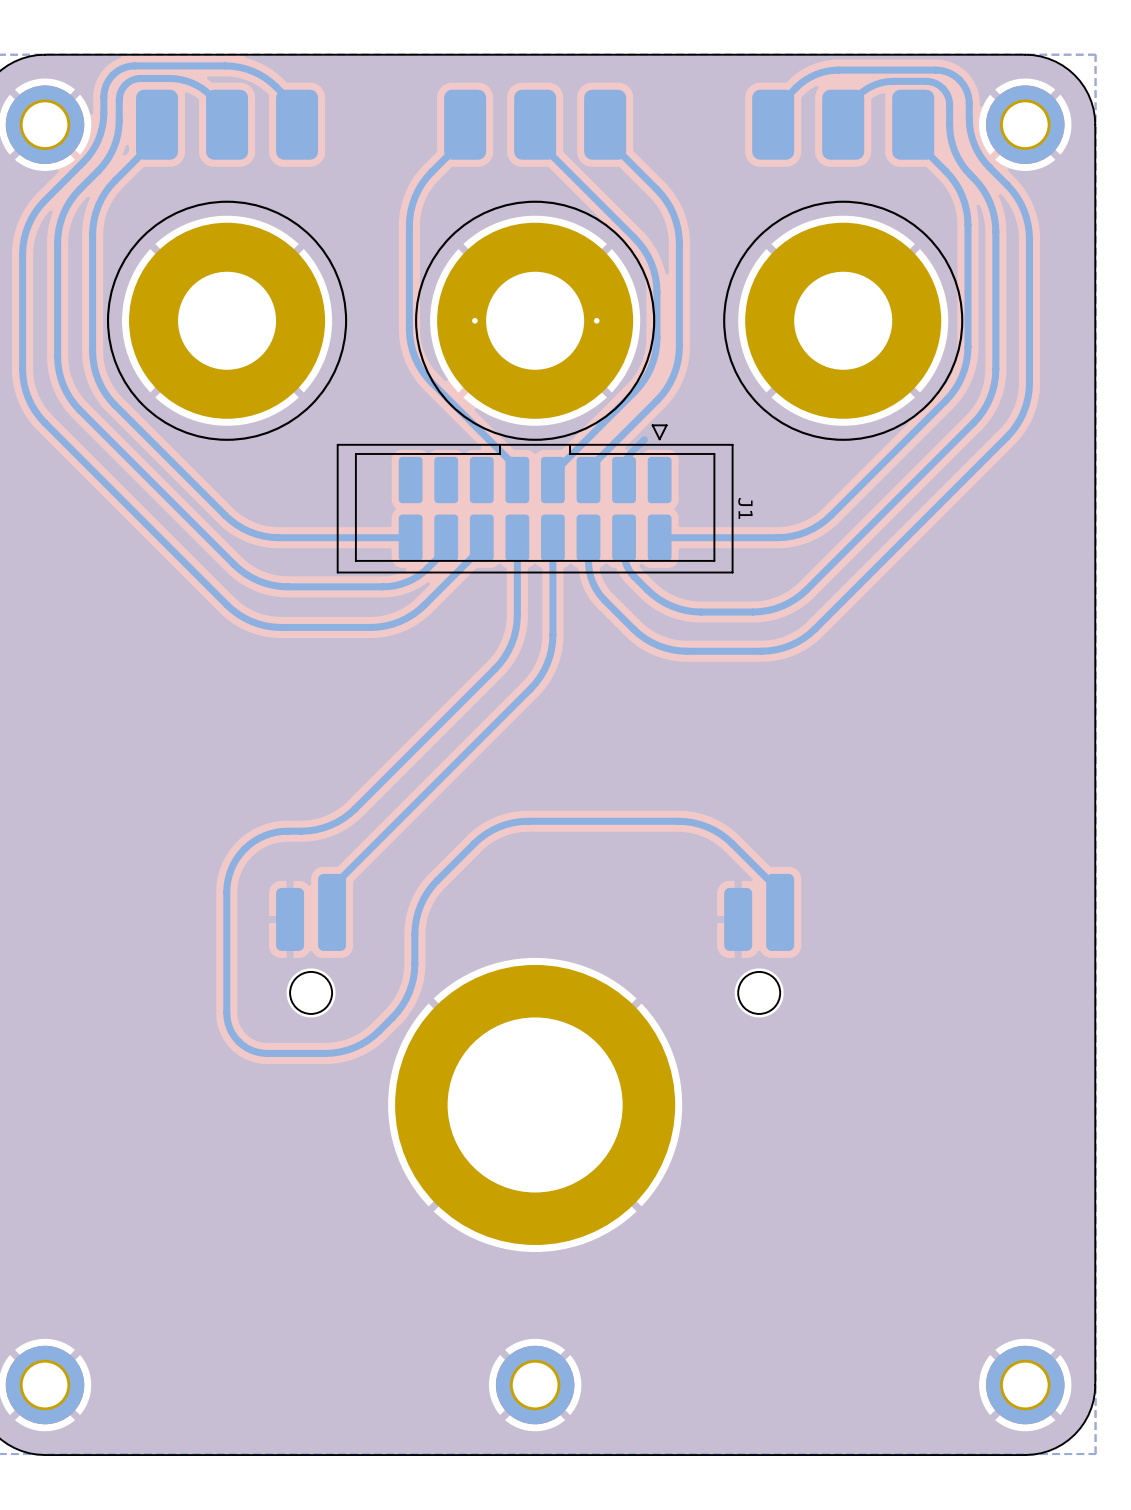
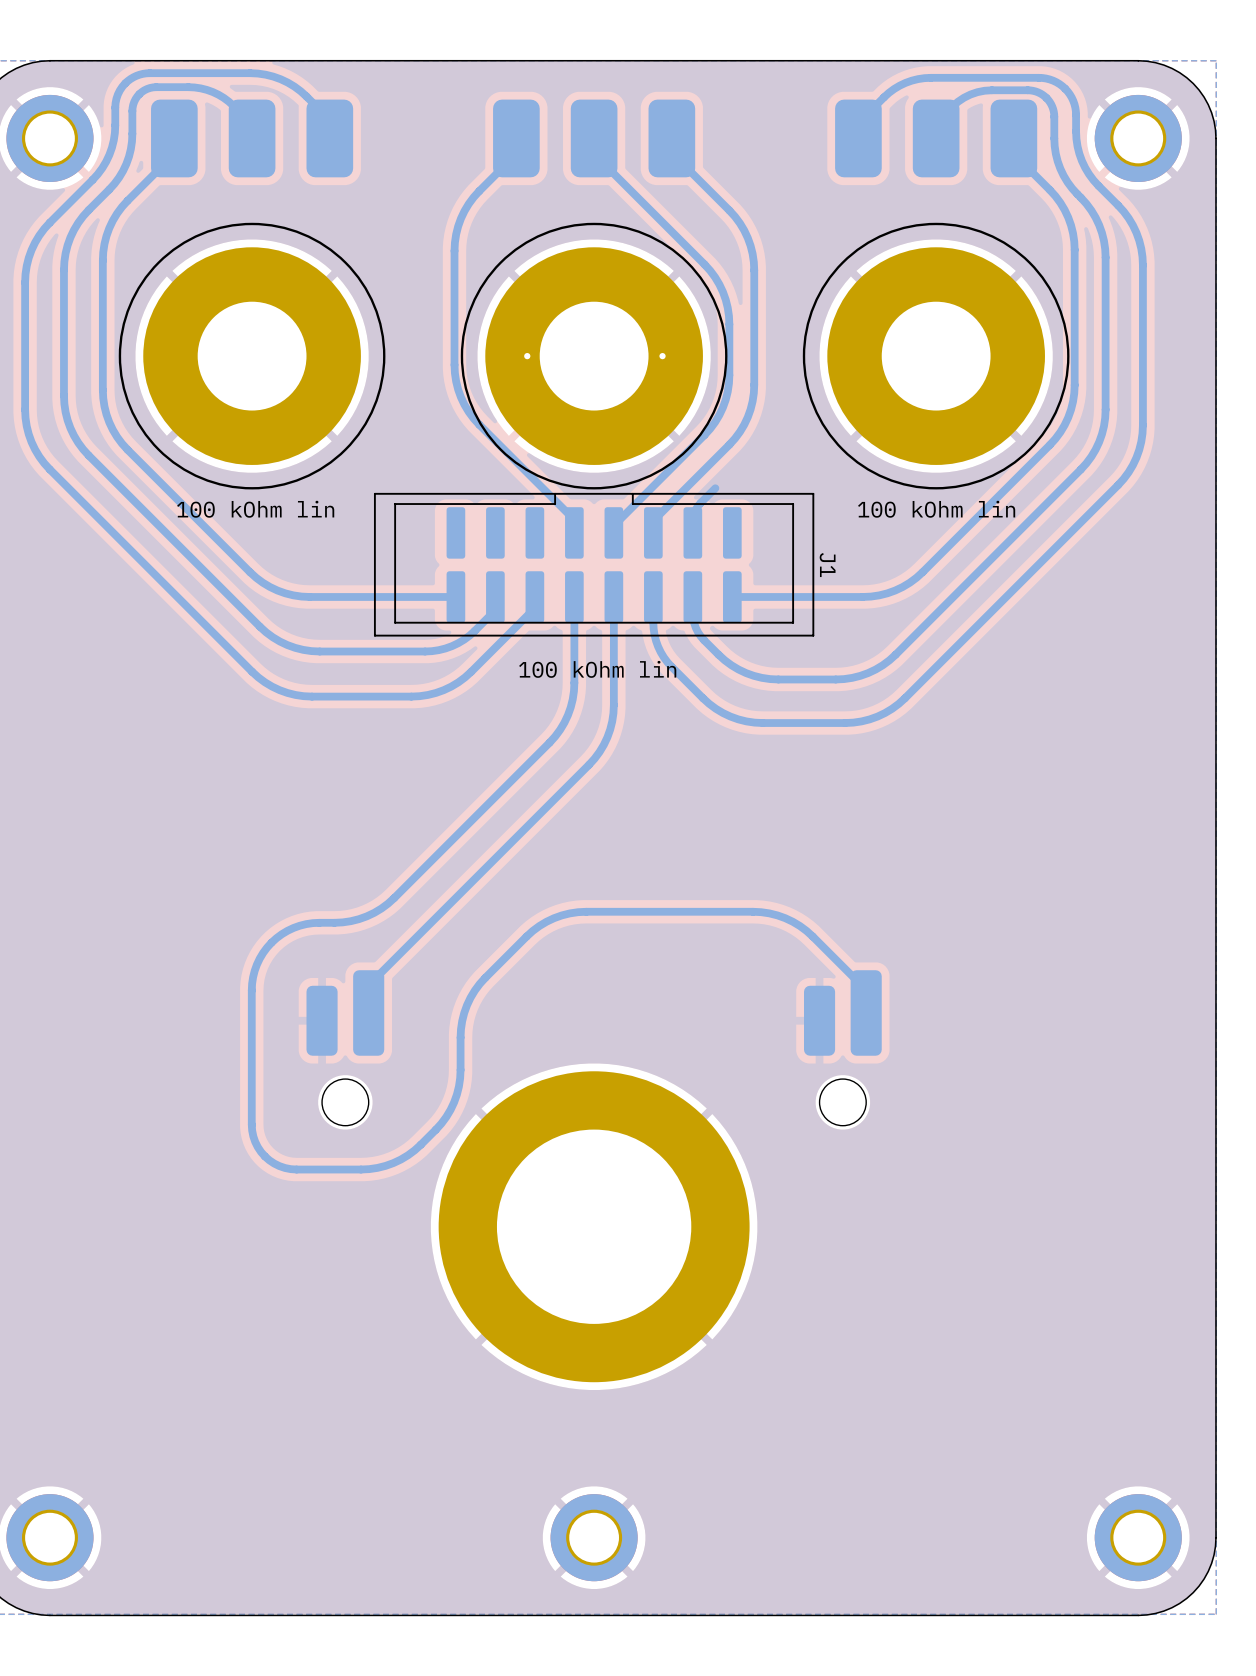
J1 footprint: [336, 424, 734, 574] -> [373, 492, 815, 637]
text: none -> 100 kOhm lin (255, 509)
text: none -> 100 kOhm lin (936, 509)
text: none -> 100 kOhm lin (597, 669)

